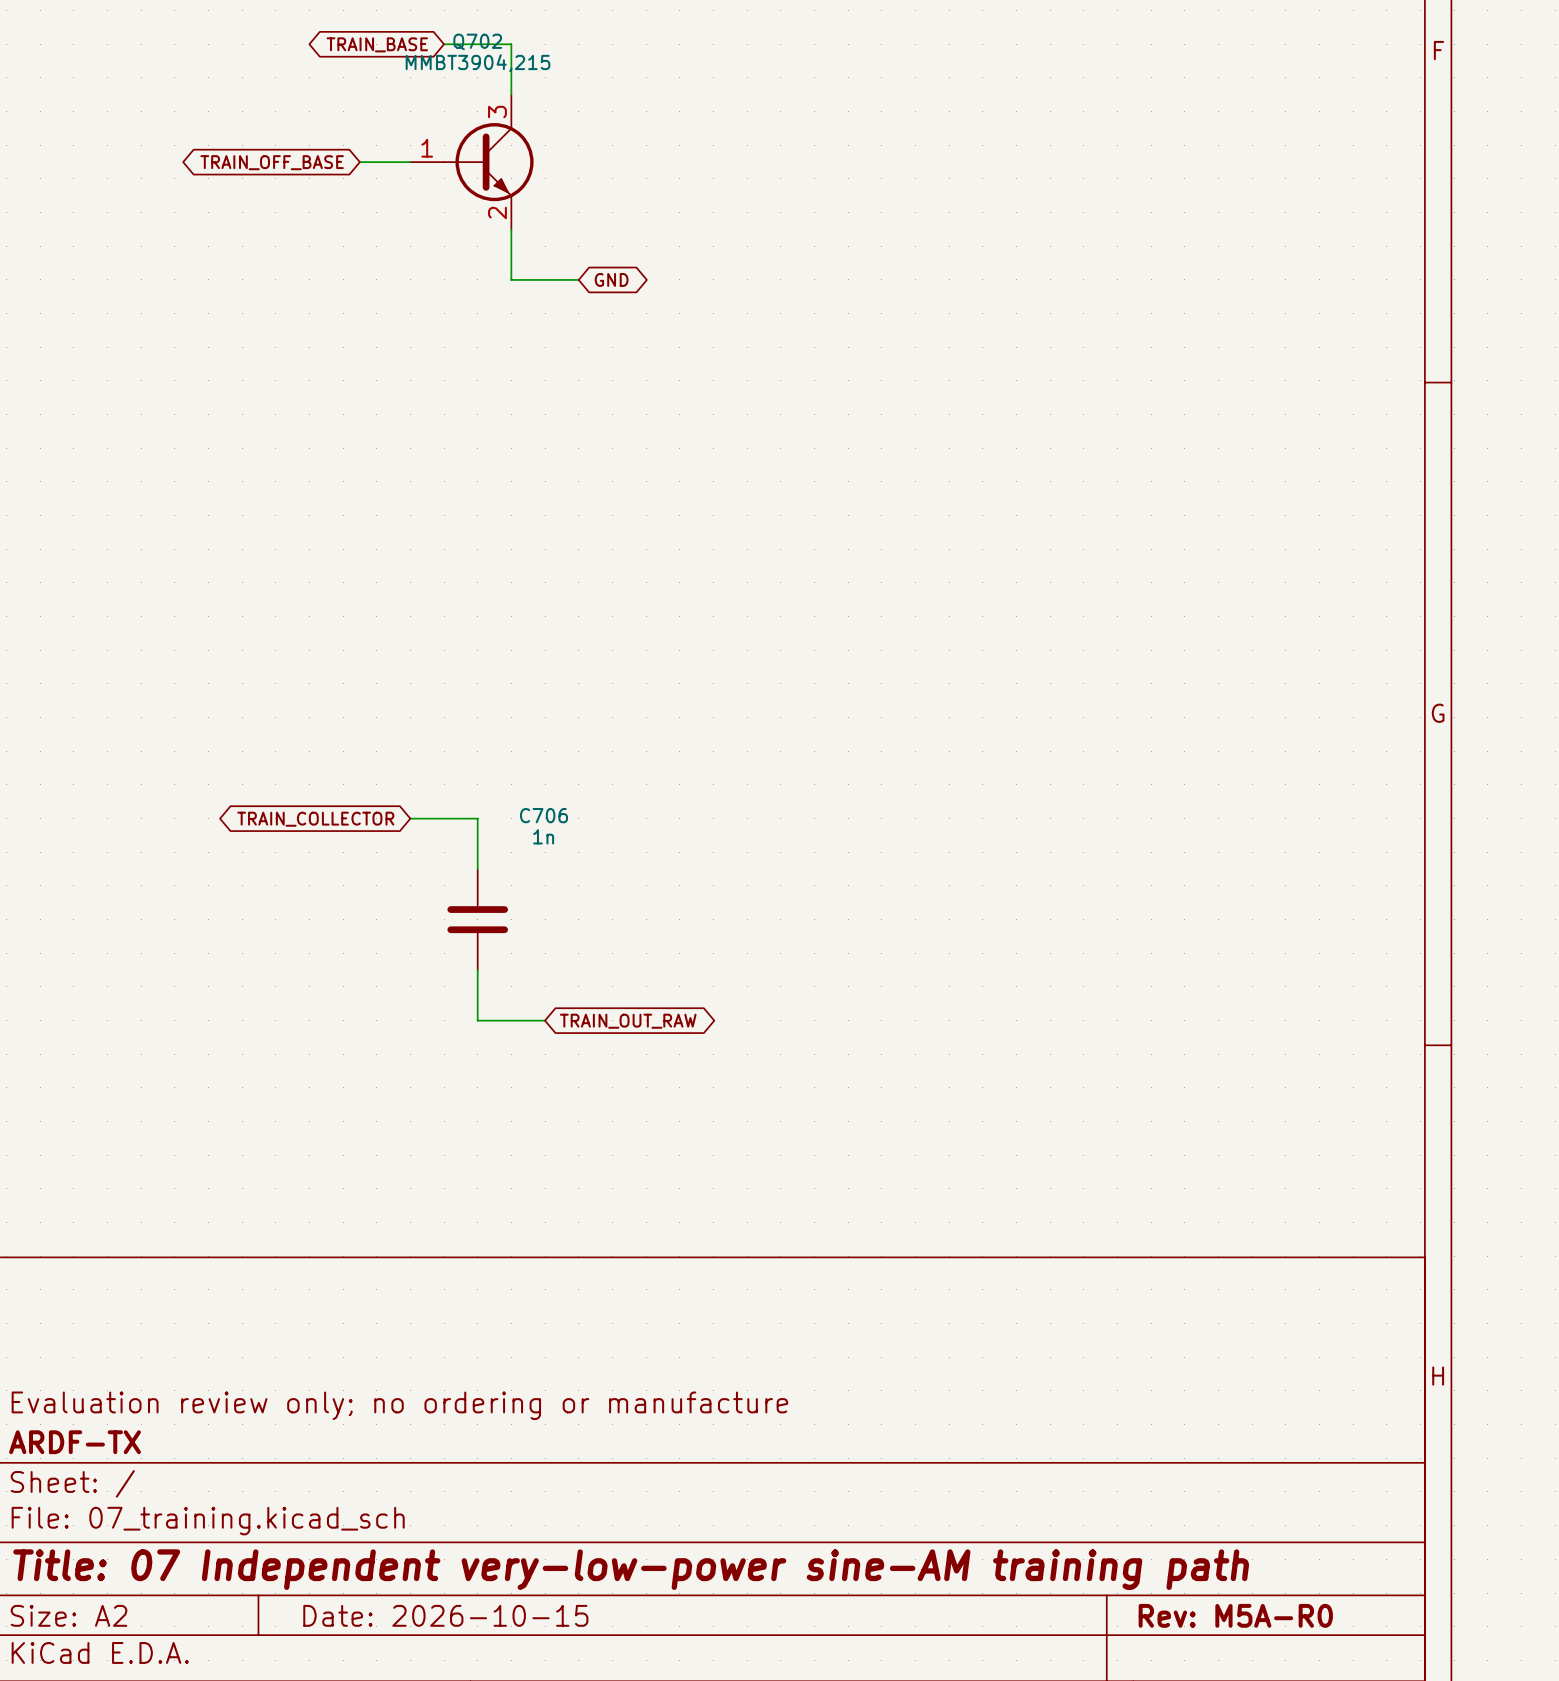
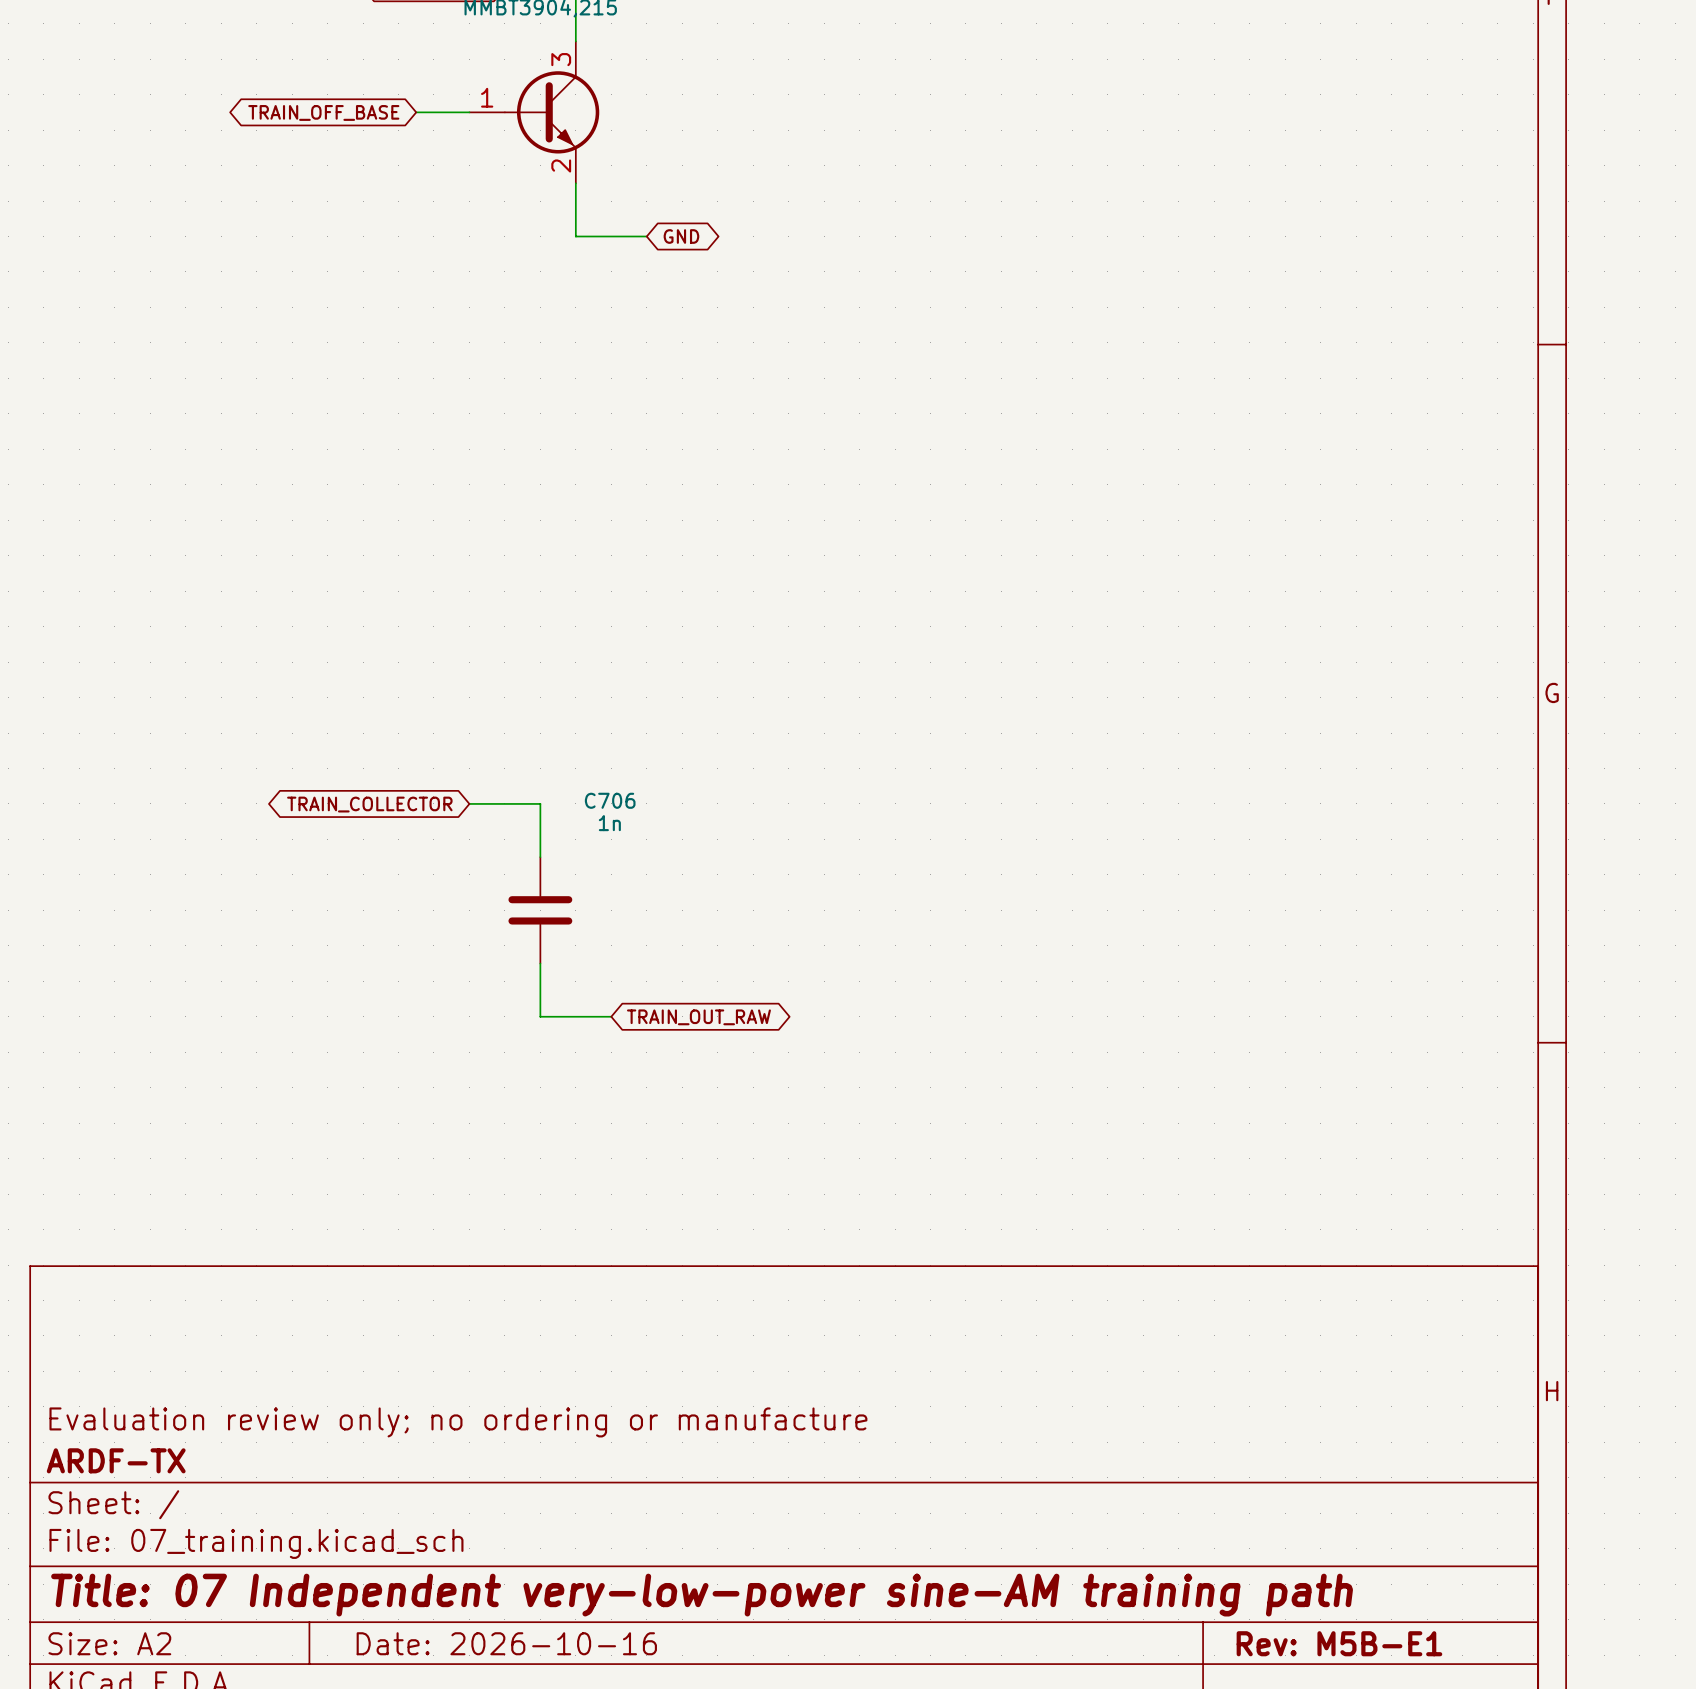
title block: Date: 2026-10-15 (445, 1615) -> Date: 2026-10-16 (506, 1643)
title block: Rev: M5A-R0 (1235, 1615) -> Rev: M5B-E1 (1339, 1643)

